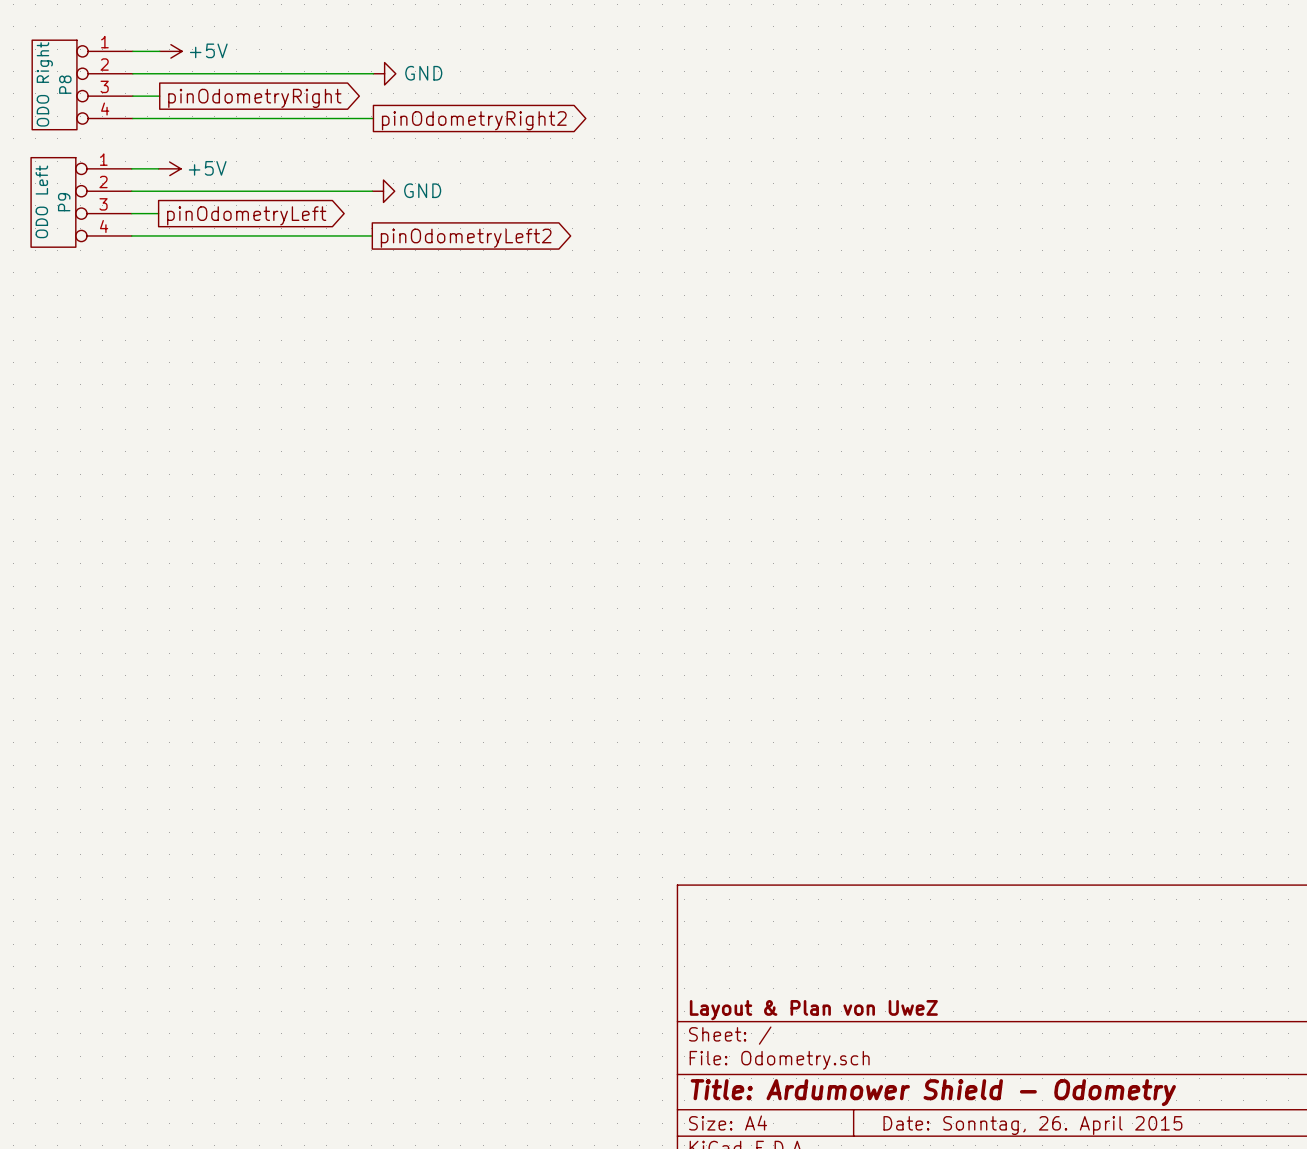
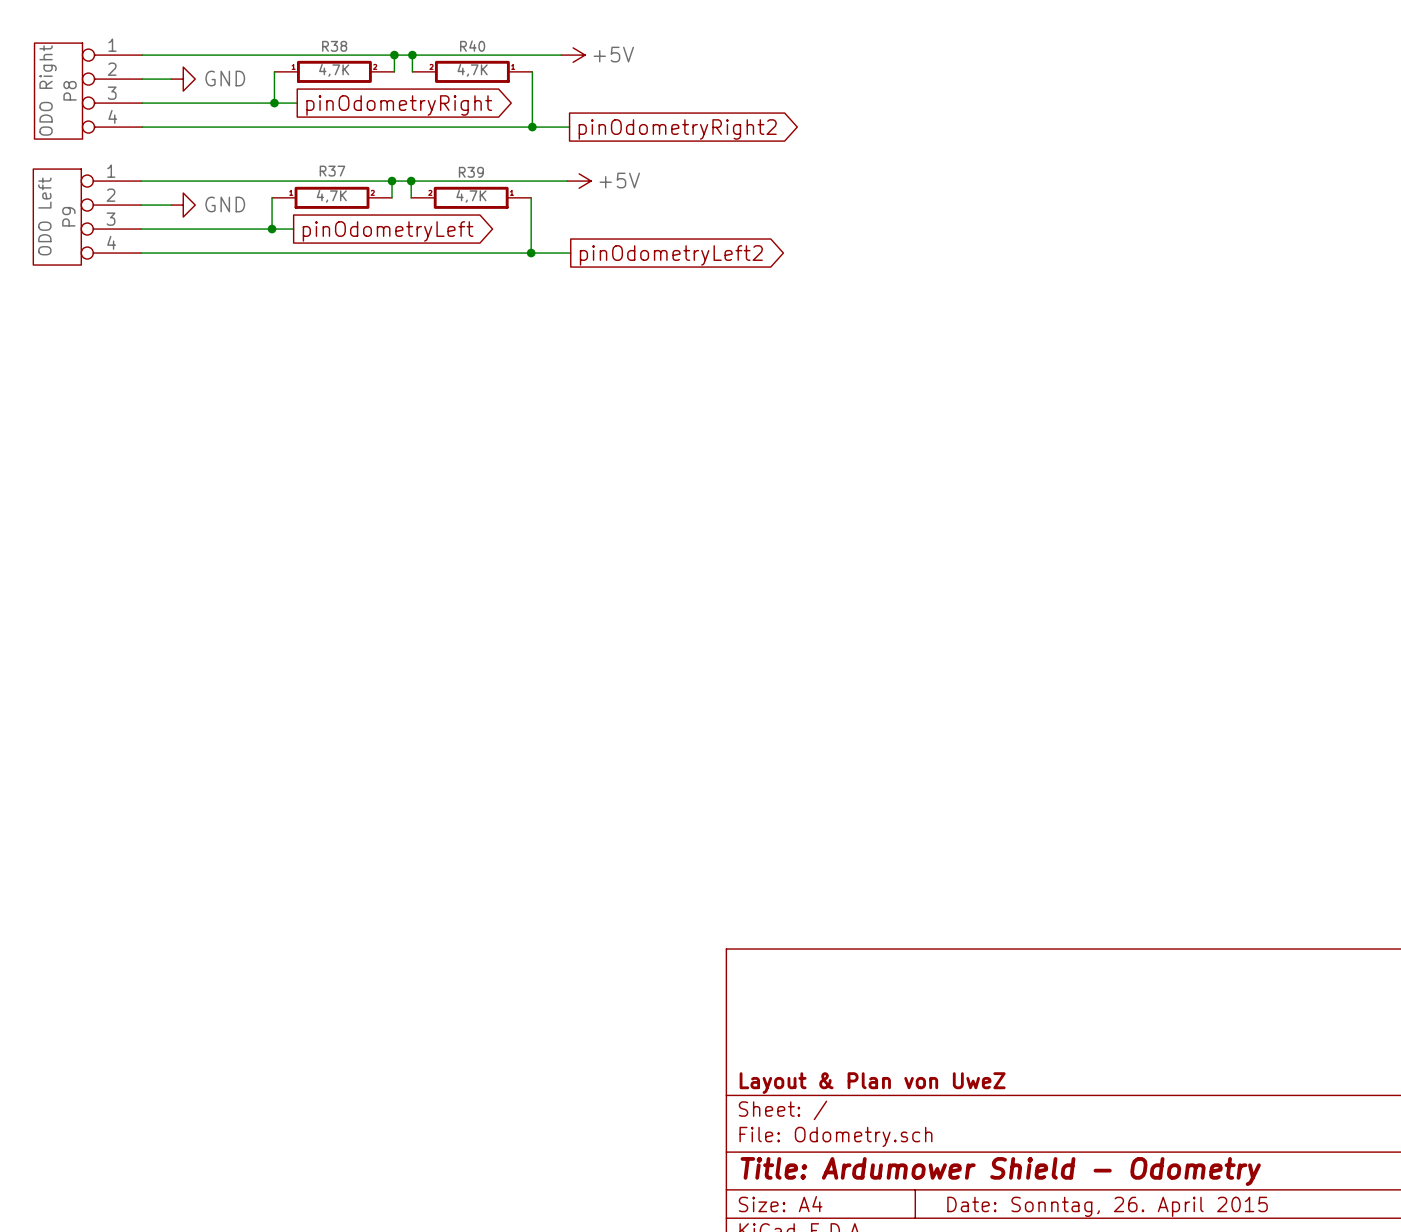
wire: none -> (171, 55) (561, 55)
power symbol: +5V (170, 51) -> none
wire: none -> (394, 55) (394, 71)
junction: none -> (394, 55)
wire: none -> (412, 55) (412, 71)
junction: none -> (412, 55)
power symbol: none -> +5V (573, 55)
wire: none -> (274, 71) (274, 103)
R38: none -> 4,7K (334, 71)
R40: none -> 4,7K (472, 71)
wire: none -> (532, 71) (532, 127)
wire: (159, 73) (373, 73) -> none
power symbol: none -> GND (183, 79)
power symbol: GND (384, 73) -> none
wire: none -> (171, 103) (297, 103)
junction: none -> (274, 103)
global label position: pinOdometryRight (254, 98) -> pinOdometryRight (399, 105)
wire: none -> (400, 127) (569, 127)
junction: none -> (532, 127)
global label position: pinOdometryRight2 (474, 120) -> pinOdometryRight2 (677, 129)
wire: none -> (170, 181) (567, 181)
power symbol: +5V (169, 168) -> none
wire: none -> (392, 181) (392, 197)
junction: none -> (392, 181)
wire: none -> (411, 181) (411, 197)
junction: none -> (411, 181)
power symbol: none -> +5V (579, 181)
wire: none -> (272, 197) (272, 229)
R37: none -> 4,7K (332, 197)
R39: none -> 4,7K (471, 197)
wire: none -> (531, 197) (531, 253)
wire: (159, 191) (372, 191) -> none
power symbol: none -> GND (183, 205)
power symbol: GND (383, 191) -> none
wire: none -> (170, 229) (293, 229)
junction: none -> (272, 229)
global label position: pinOdometryLeft (246, 215) -> pinOdometryLeft (388, 231)
wire: none -> (399, 253) (570, 253)
junction: none -> (531, 253)
global label position: pinOdometryLeft2 (466, 238) -> pinOdometryLeft2 (671, 255)

